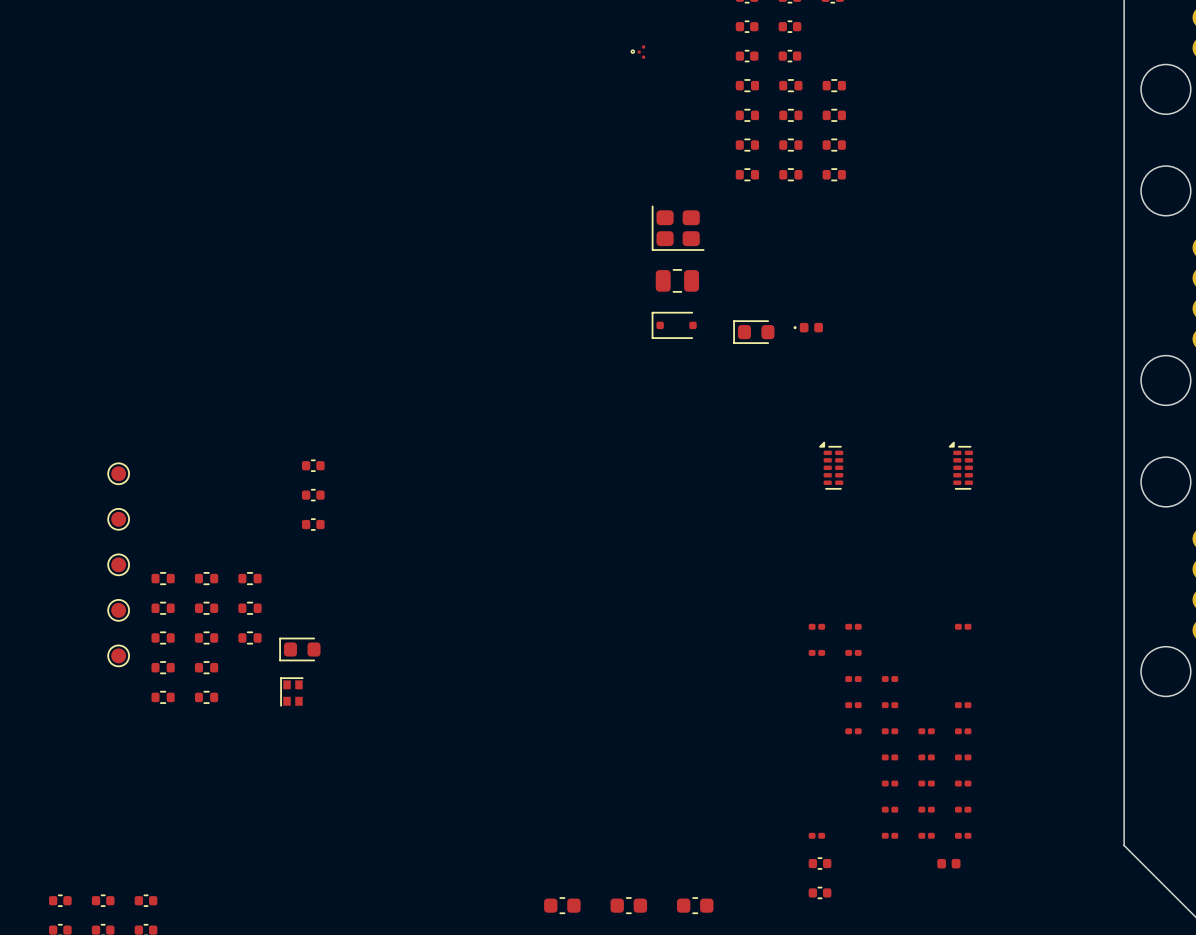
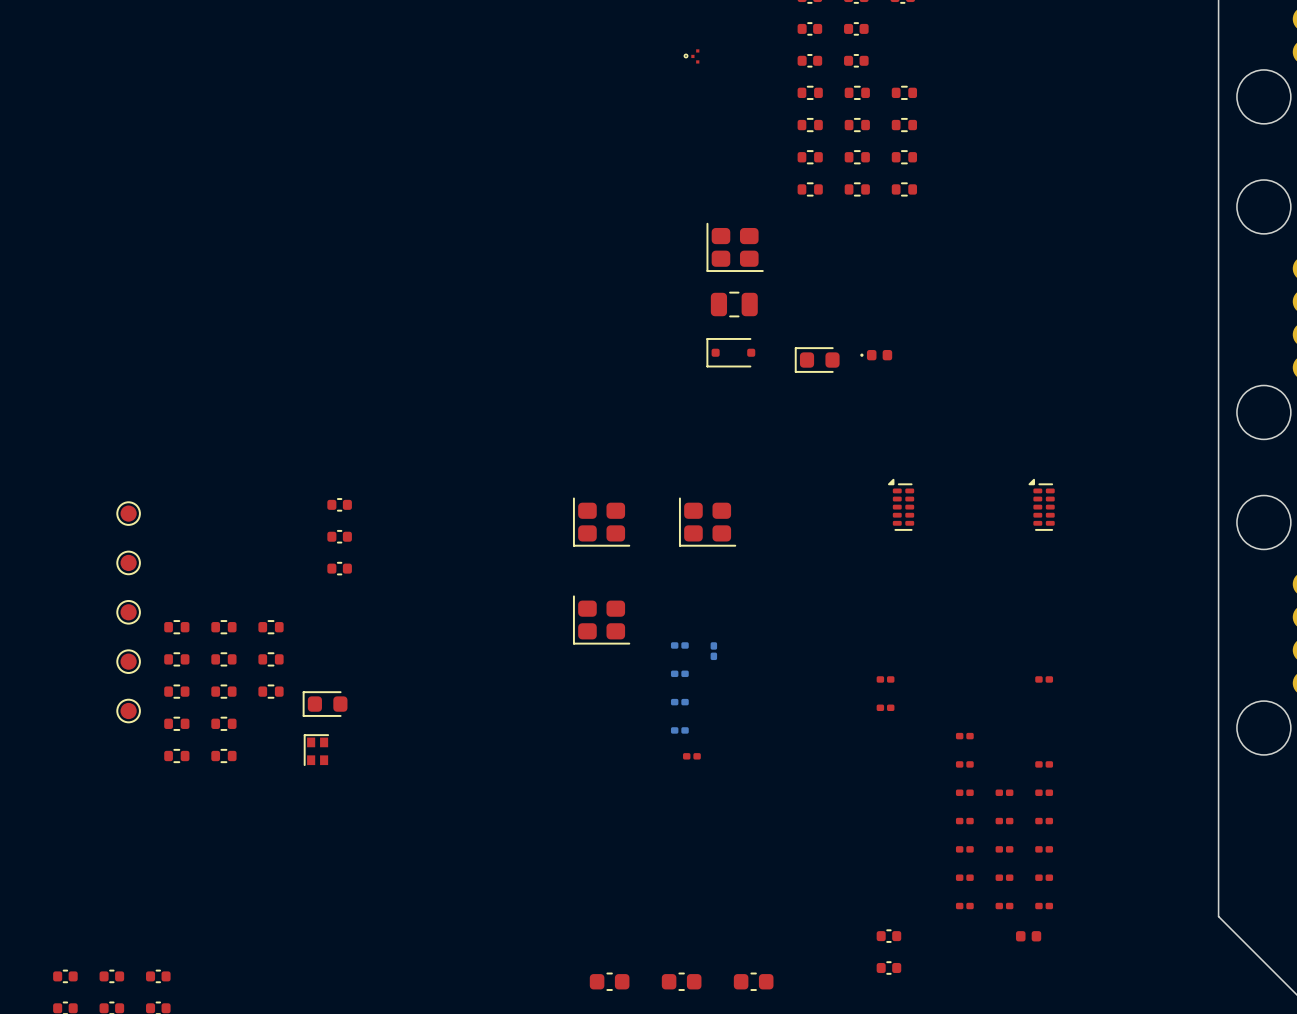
part: none -> (601, 522)
part: none -> (707, 522)
part: none -> (601, 619)
part side: top (853, 626) -> bottom (679, 673)
part side: top (853, 652) -> bottom (679, 702)
part side: top (853, 679) -> bottom (679, 730)
part side: top (853, 705) -> bottom (713, 651)
part position: (853, 731) -> (691, 756)
part side: top (816, 835) -> bottom (679, 645)

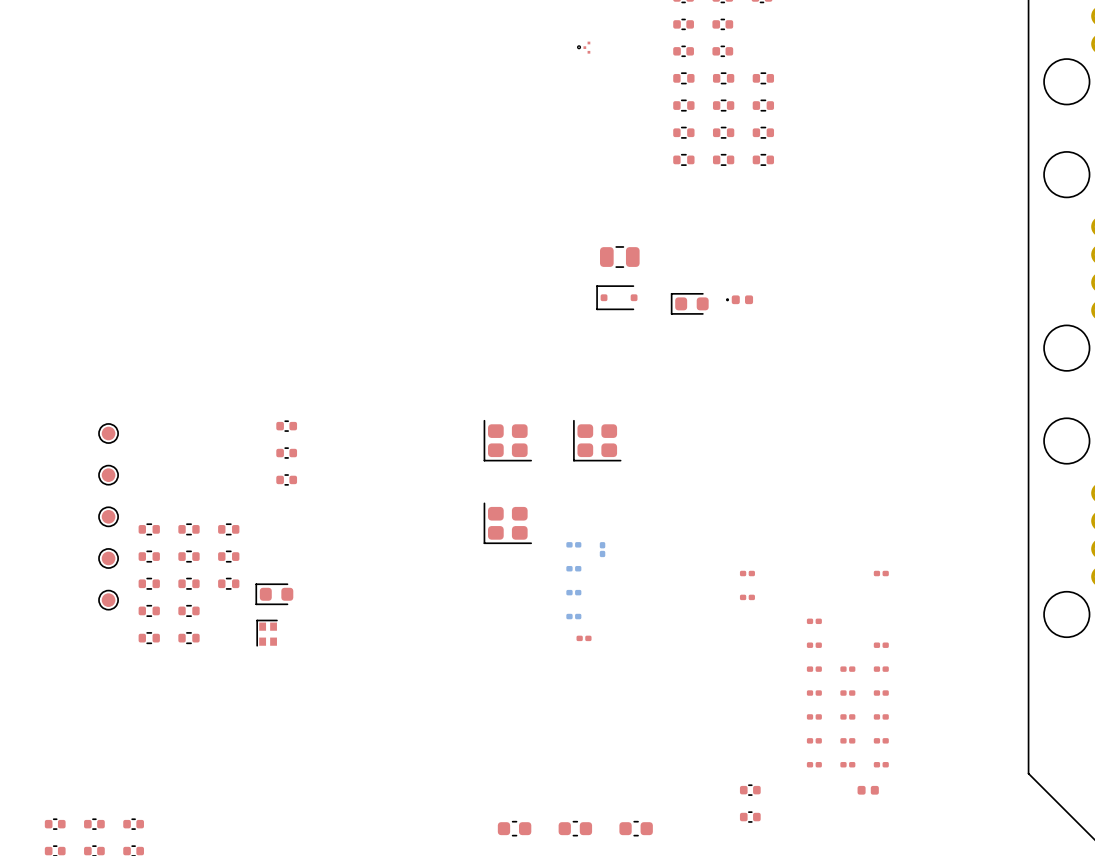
part: (735, 247) -> none
part: (901, 504) -> none
part: (1041, 504) -> none

